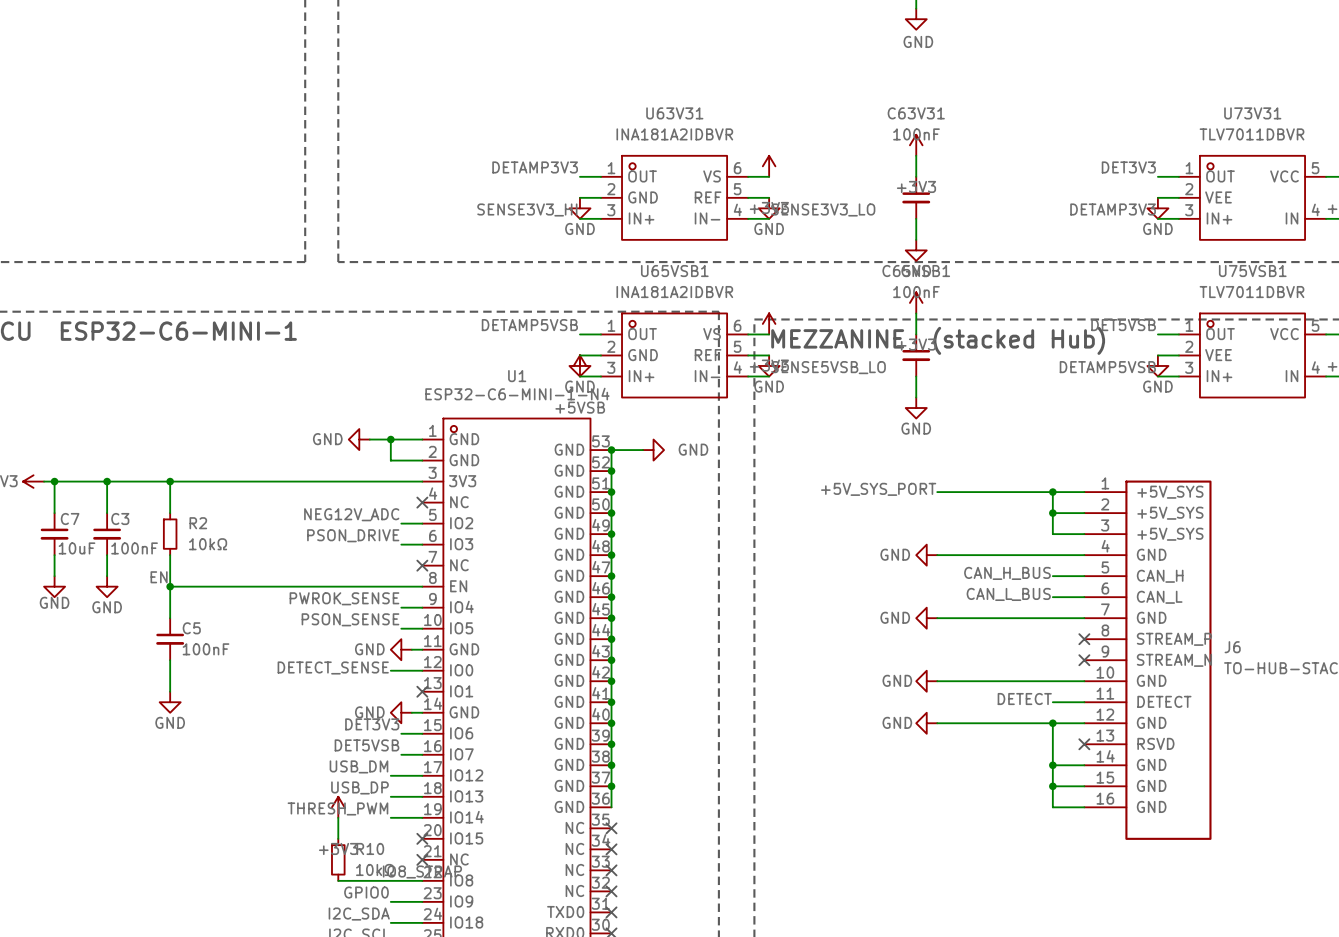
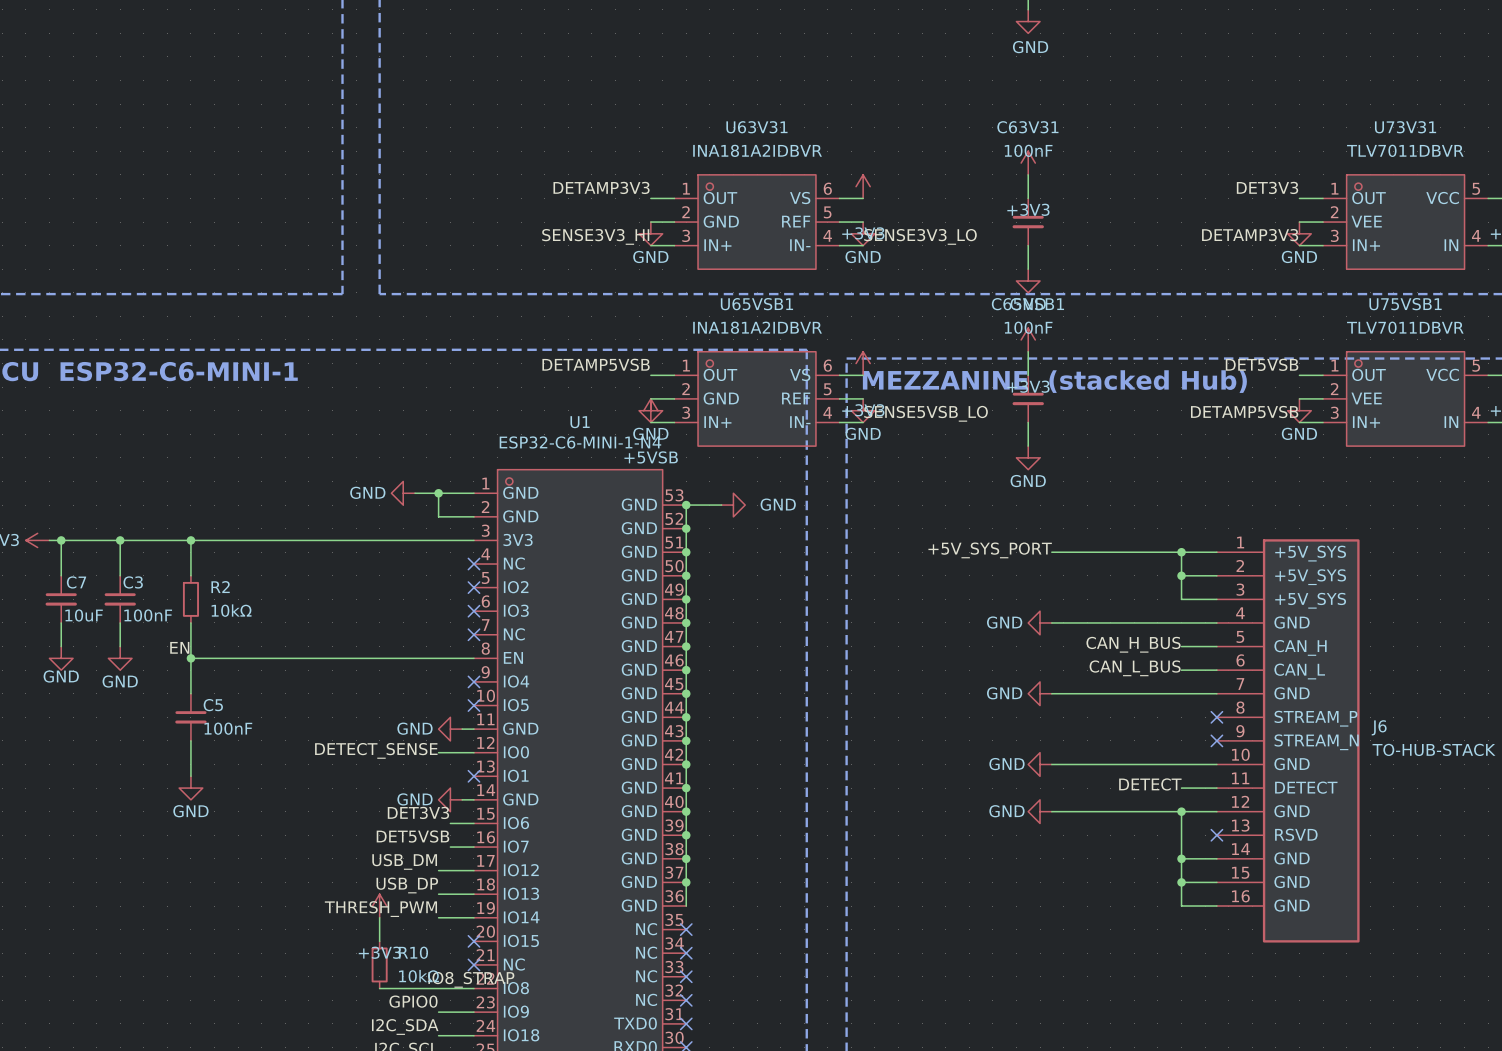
label: NEG12V_ADC (351, 514) -> none
wire: (401, 523) (422, 523) -> none
no-connect mark: none -> (473, 587)
label: PSON_DRIVE (353, 535) -> none
wire: (401, 544) (422, 544) -> none
no-connect mark: none -> (473, 611)
label: PWROK_SENSE (344, 598) -> none
wire: (401, 607) (422, 607) -> none
no-connect mark: none -> (473, 681)
label: PSON_SENSE (350, 619) -> none
wire: (401, 628) (422, 628) -> none
no-connect mark: none -> (473, 705)

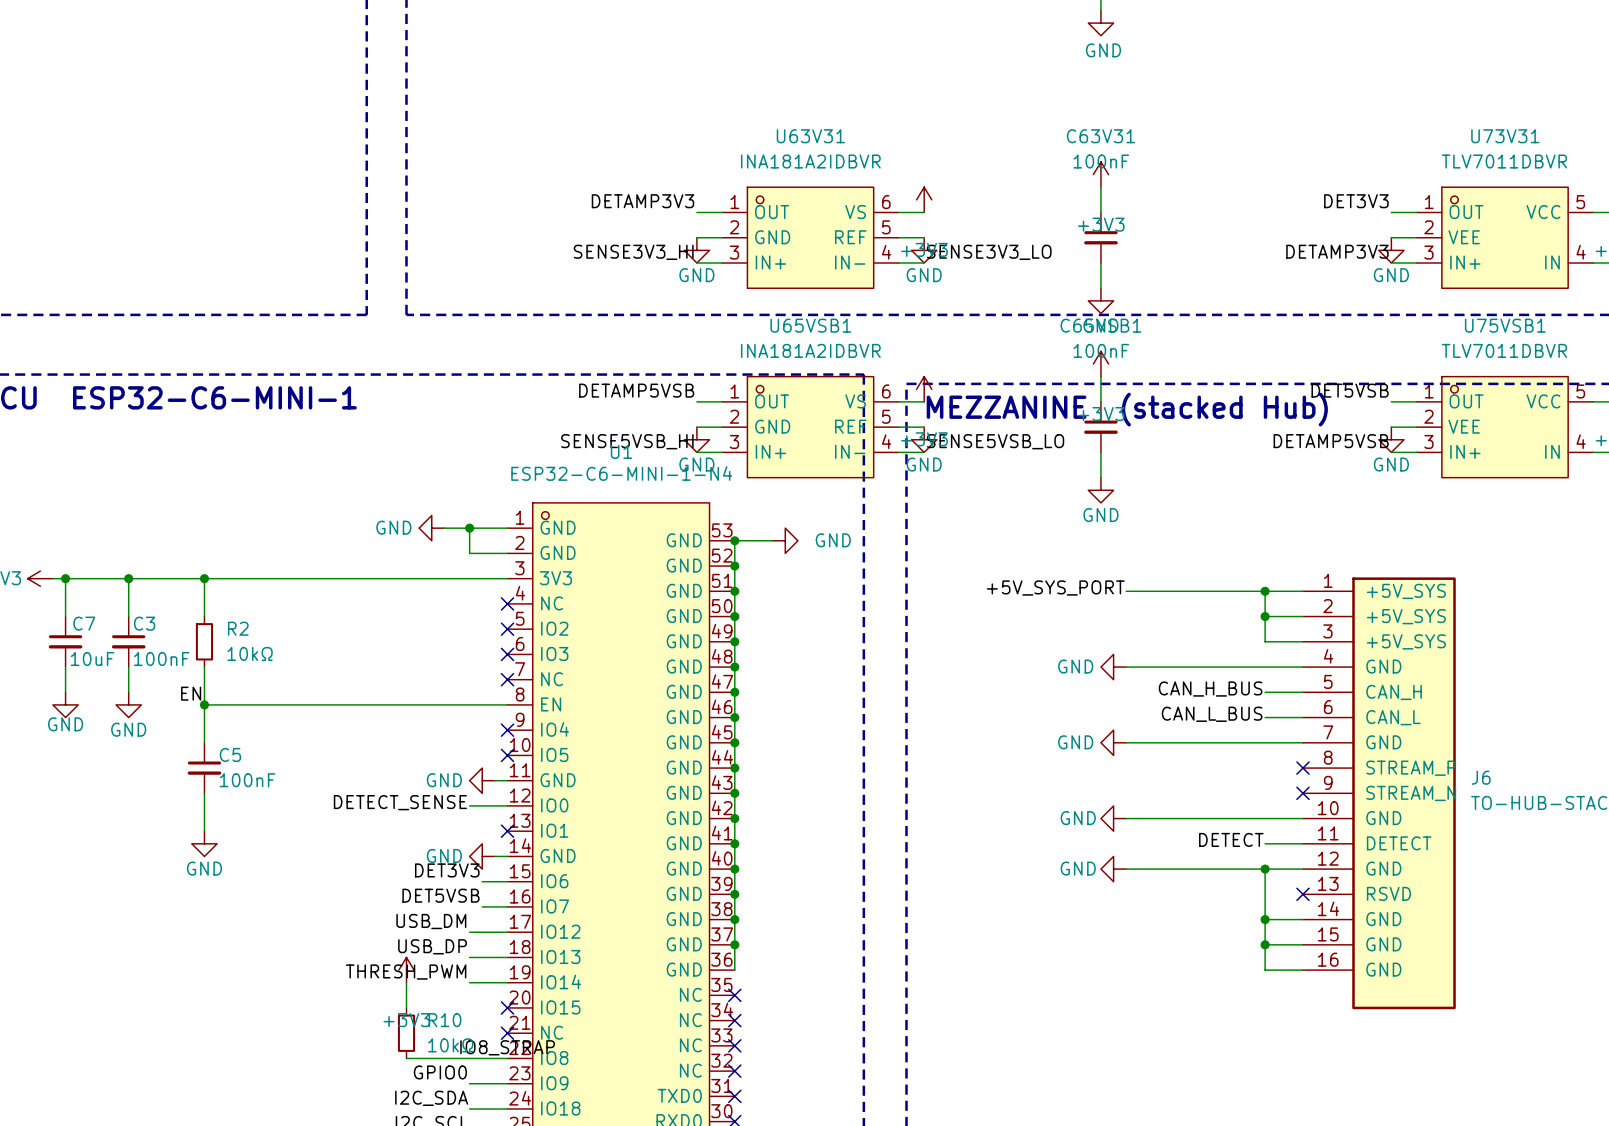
power symbol: +5VSB (650, 410) -> none
label: none -> SENSE5VSB_HI (627, 441)

